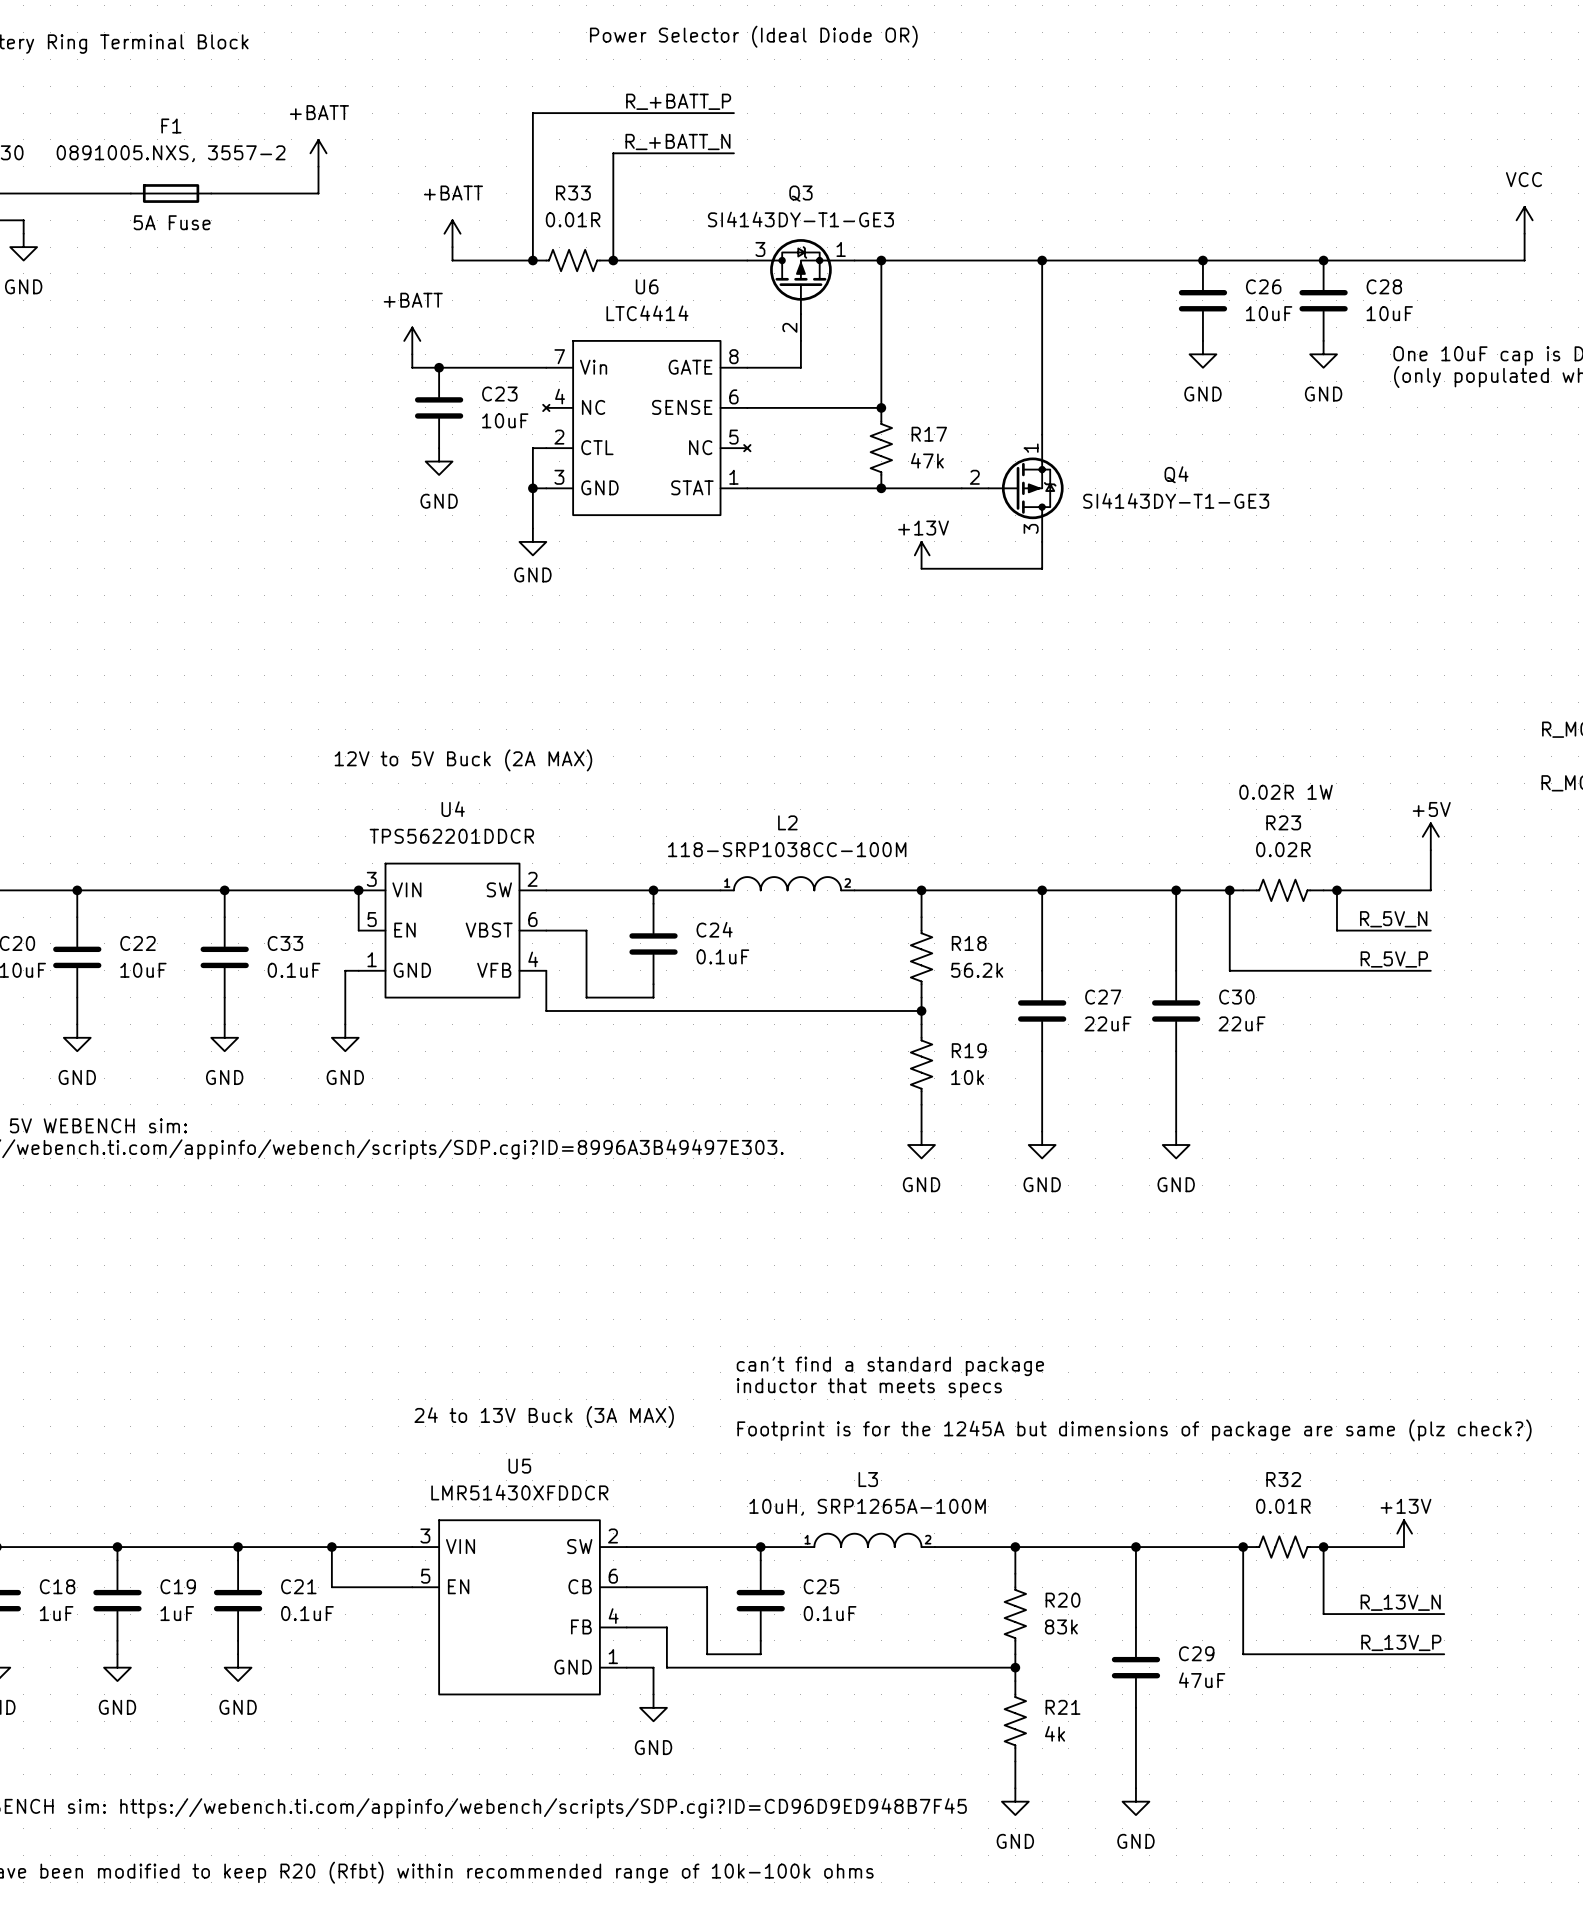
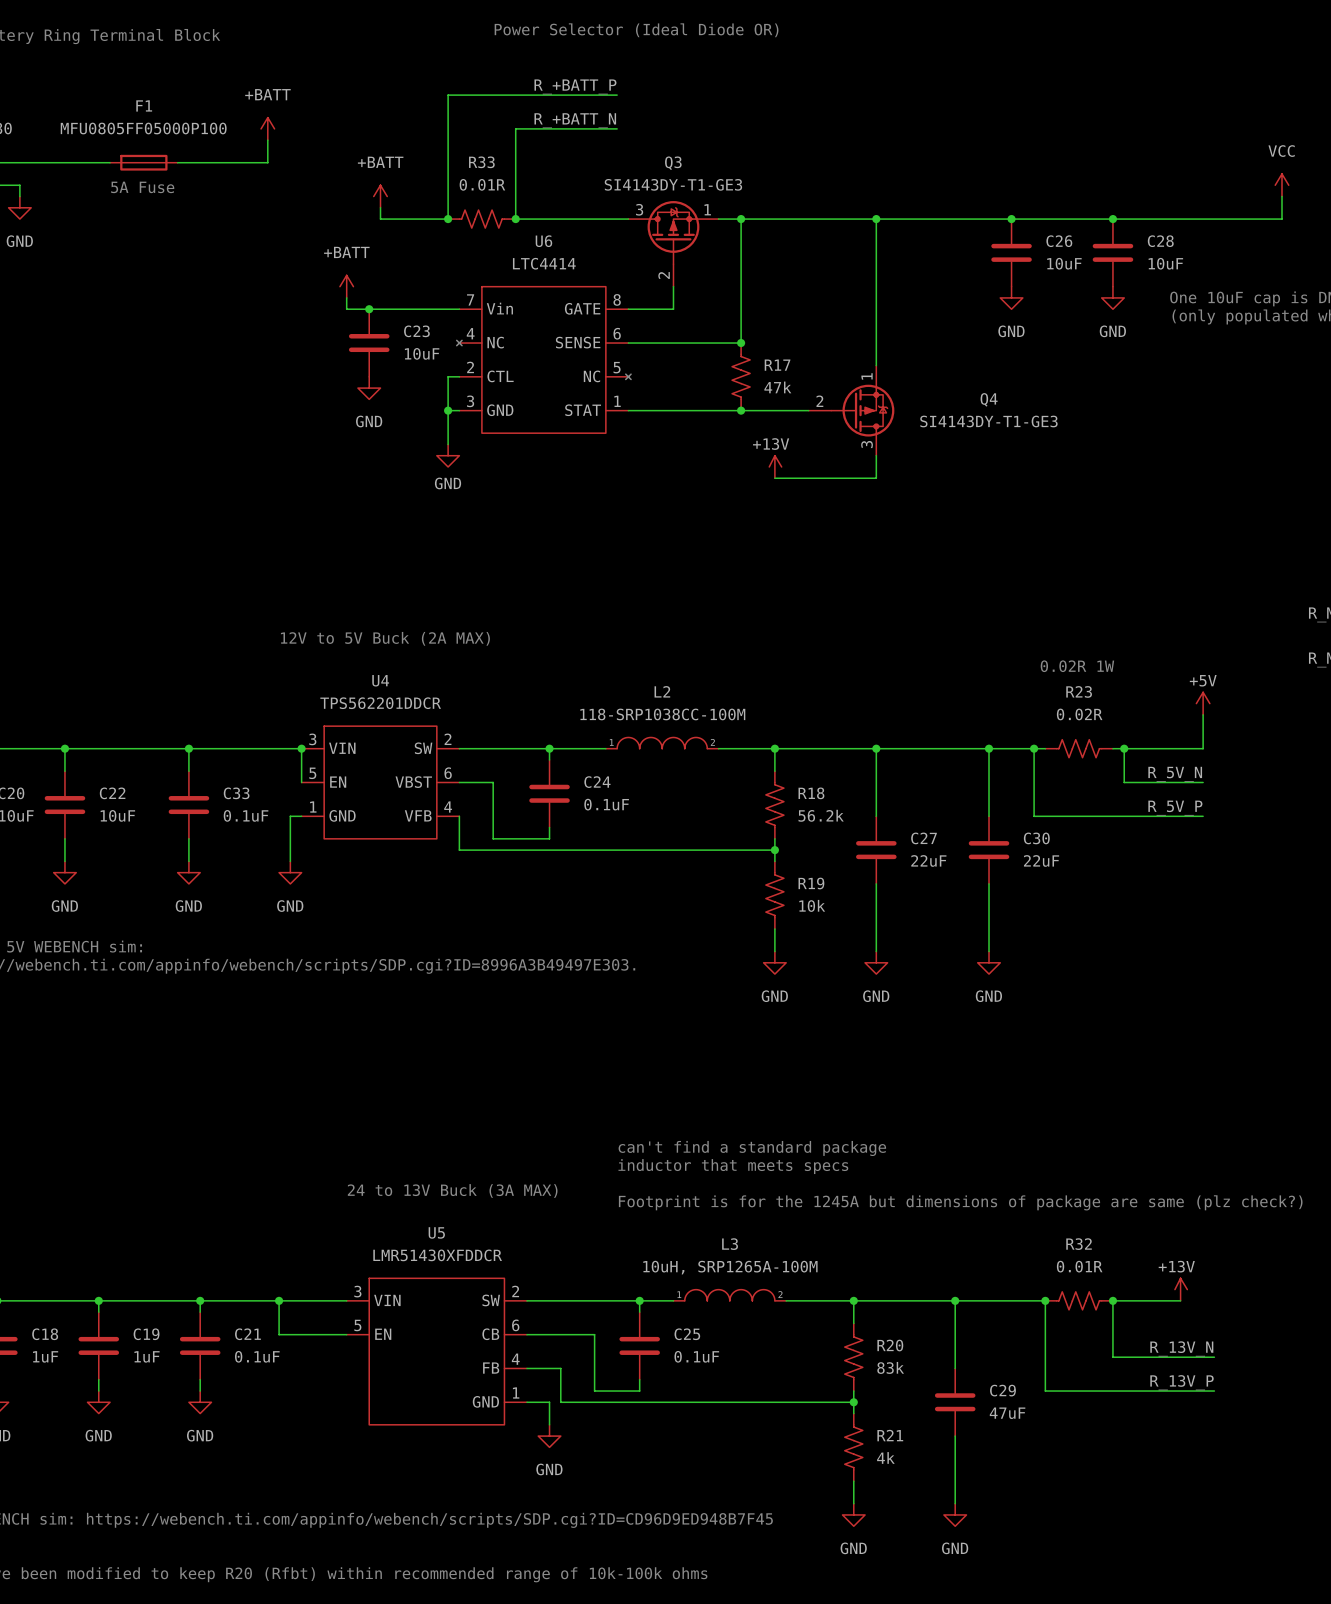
F1 value: 0891005.NXS, 3557-2 (171, 153) -> MFU0805FF05000P100 (143, 128)

